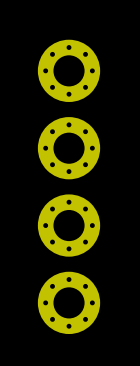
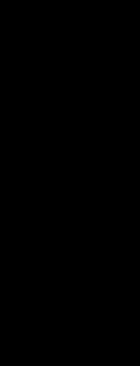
part: (69, 70) -> none
part: (69, 148) -> none
part: (69, 225) -> none
part: (69, 302) -> none

